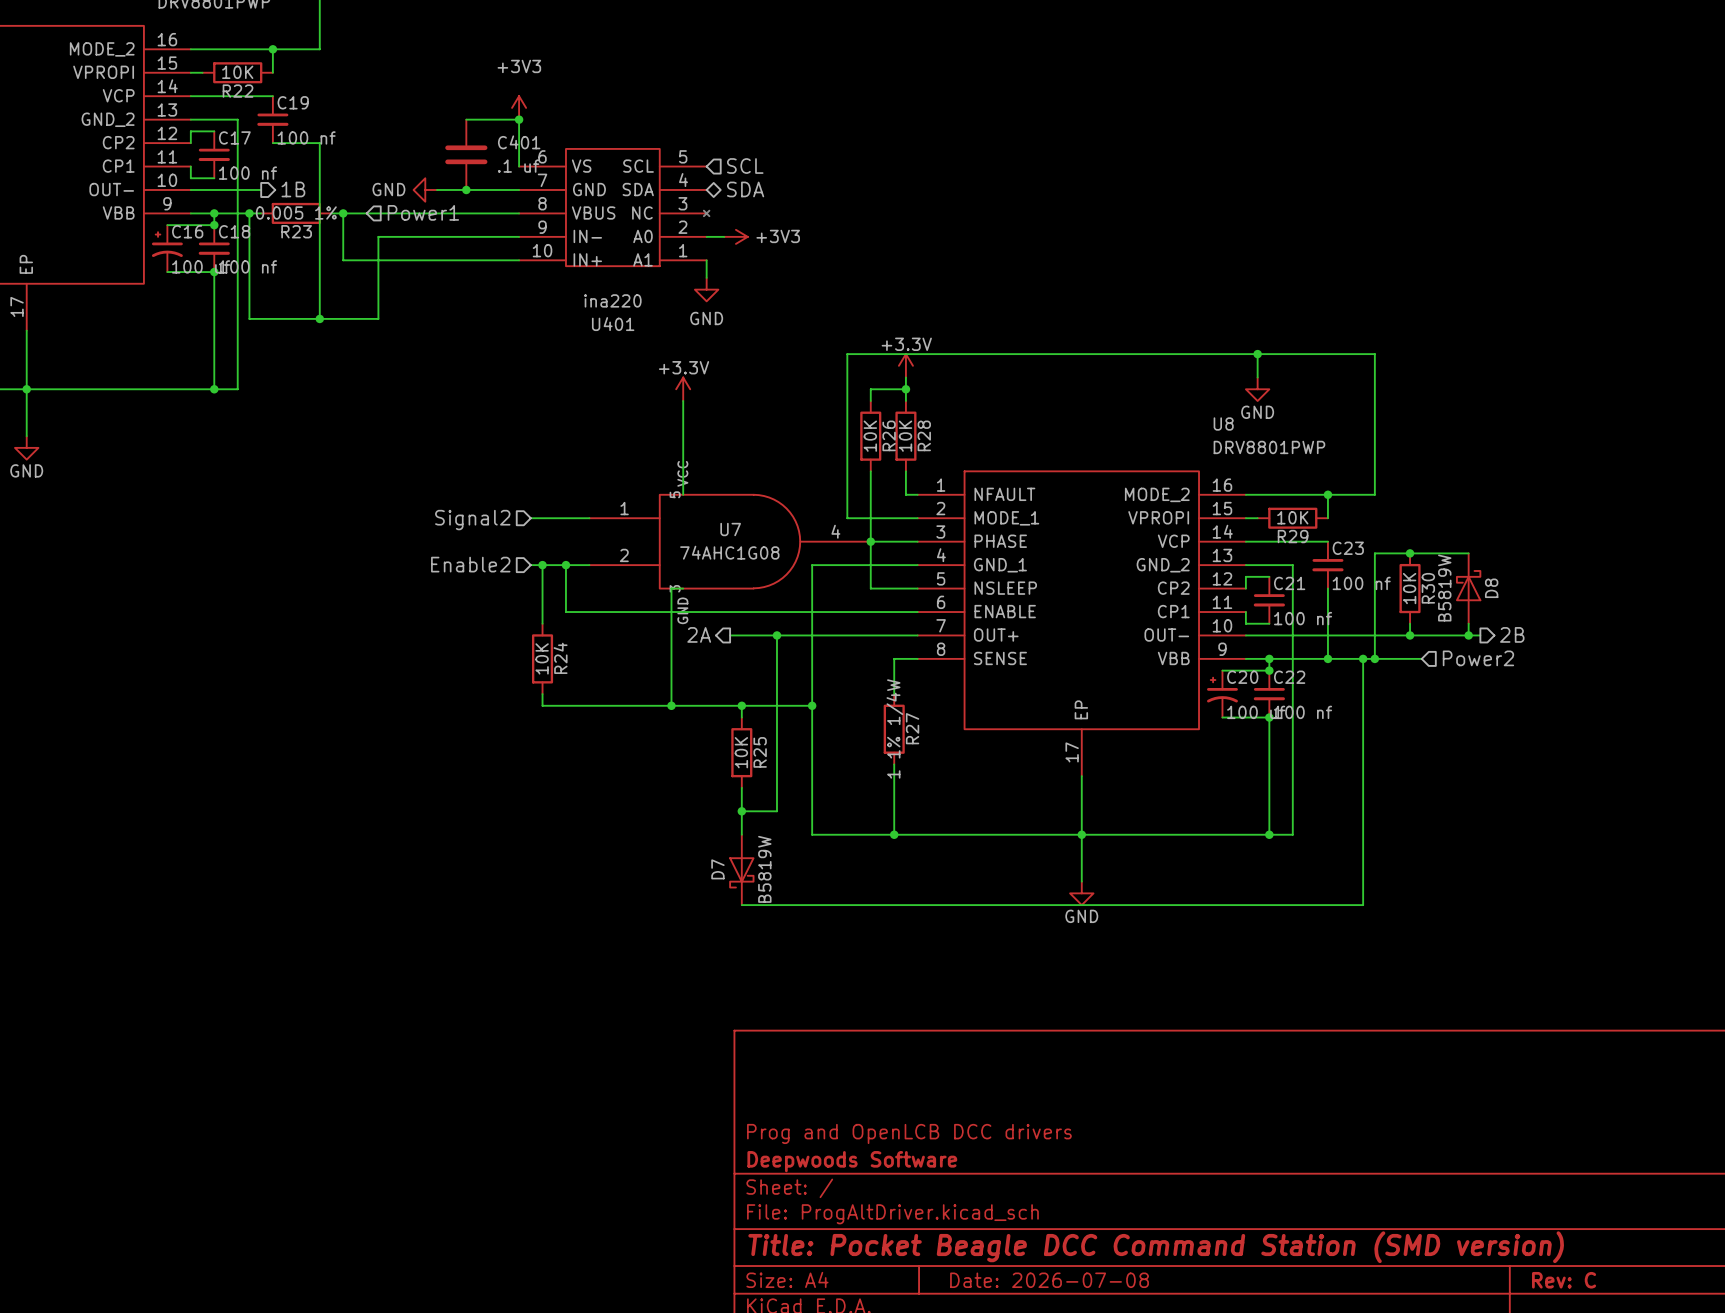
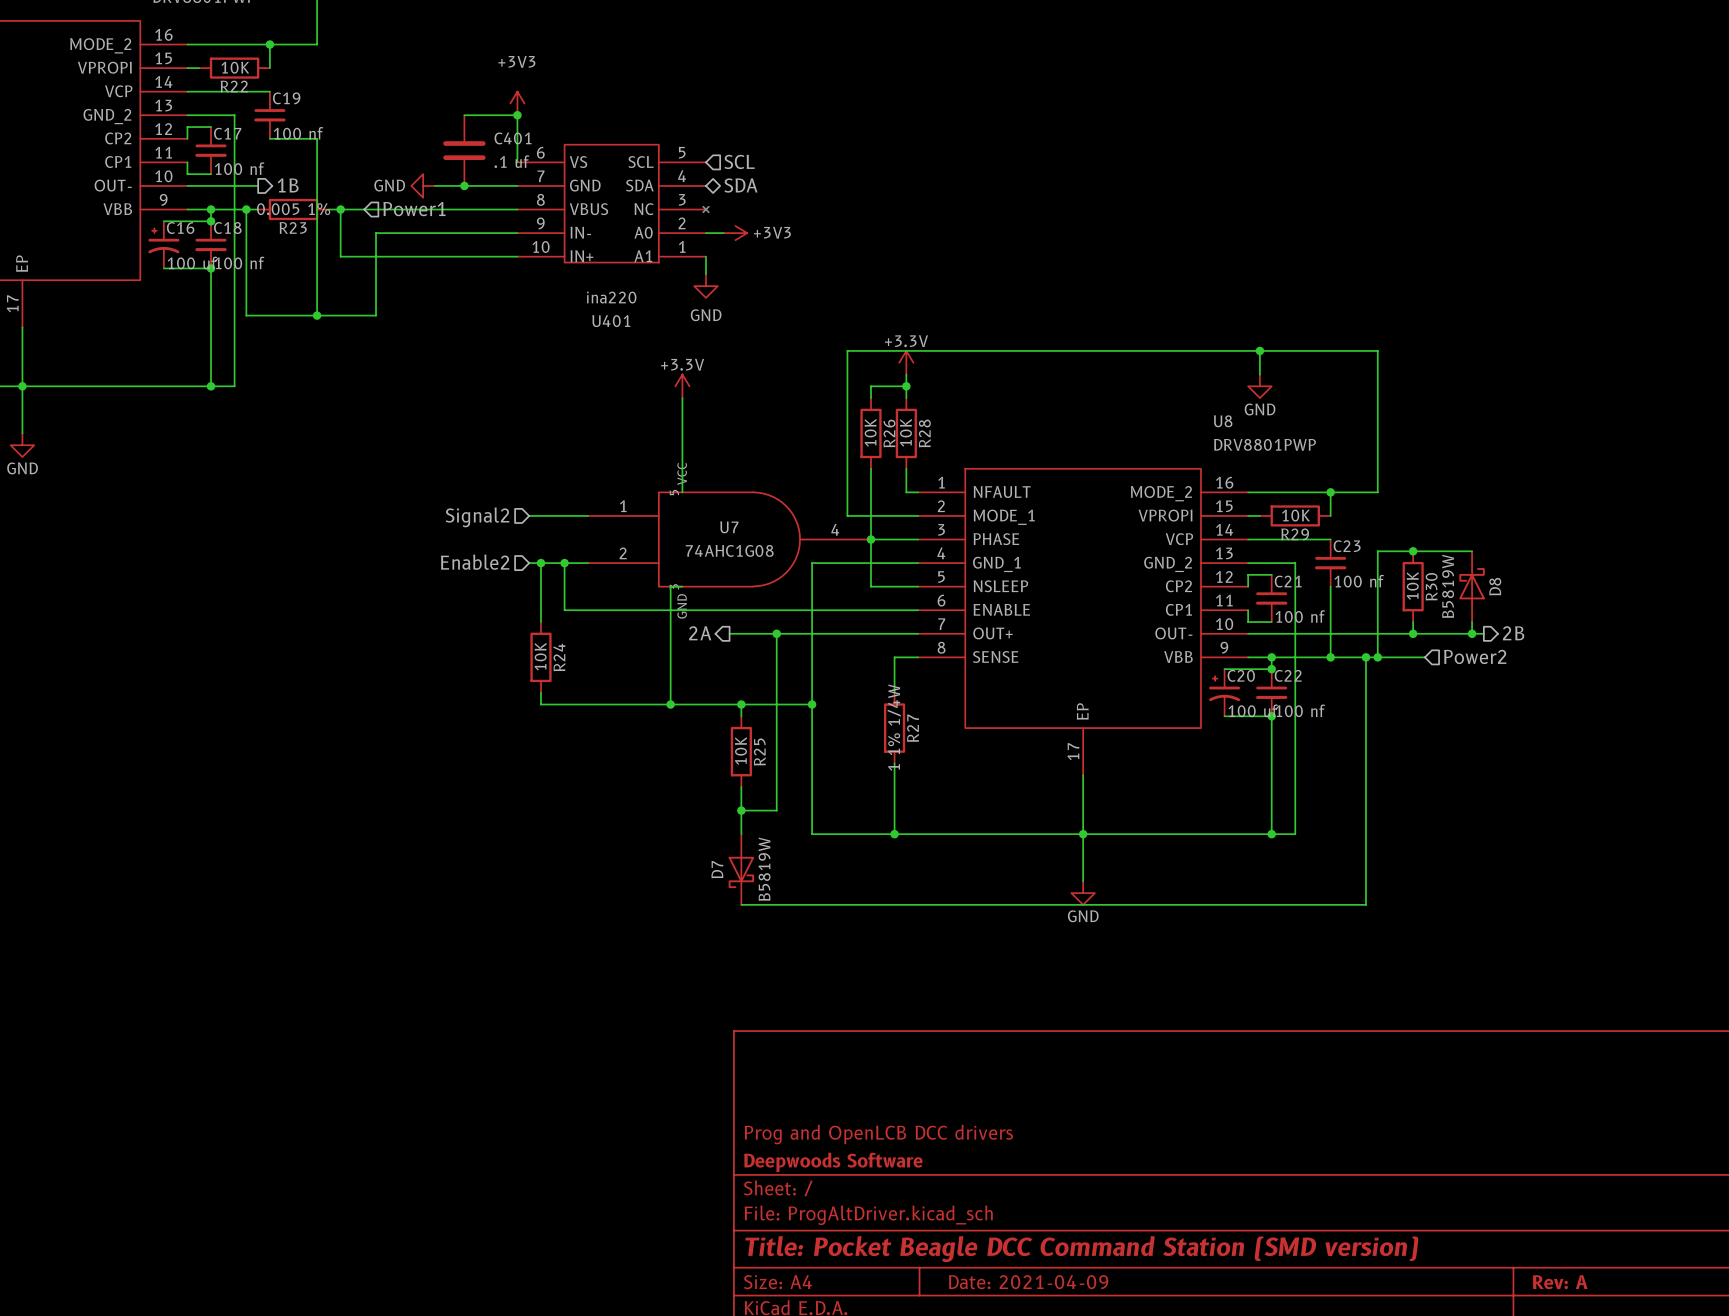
title block: Date: 2026-07-08 (1049, 1280) -> Date: 2021-04-09 (1028, 1282)
title block: Rev: C (1564, 1280) -> Rev: A (1560, 1282)

